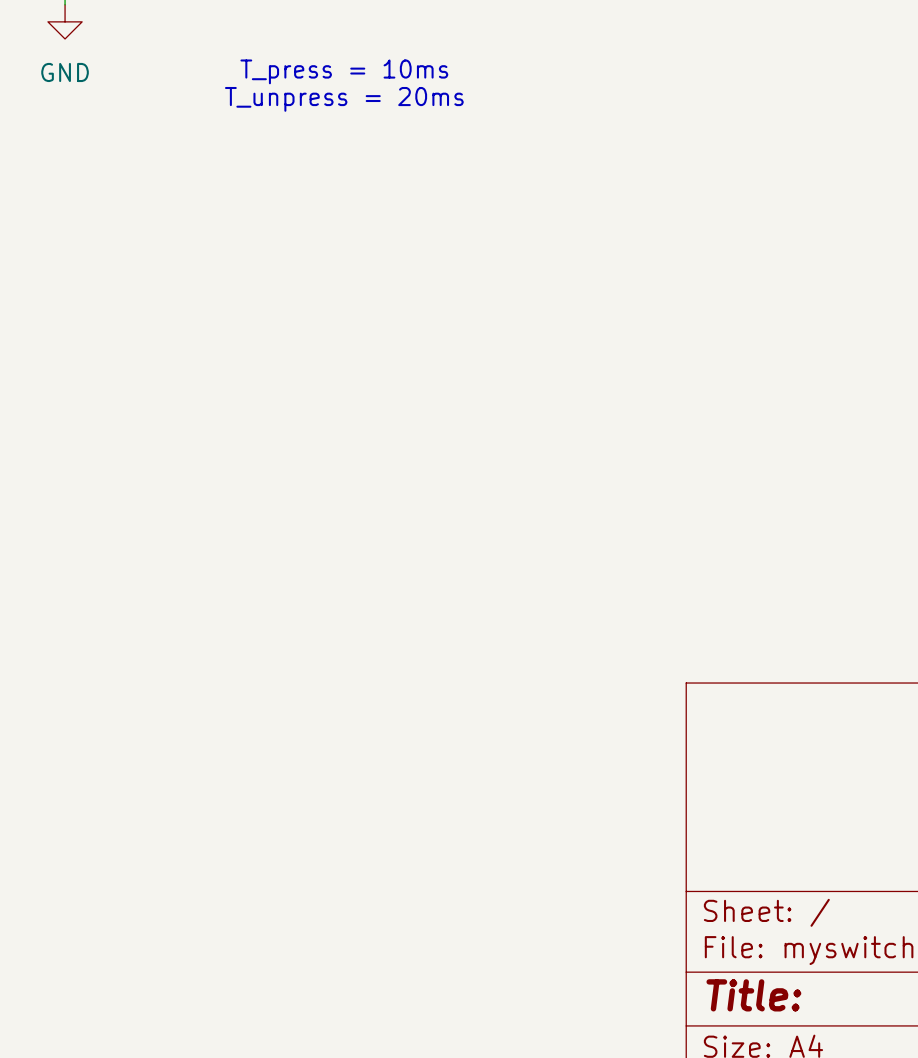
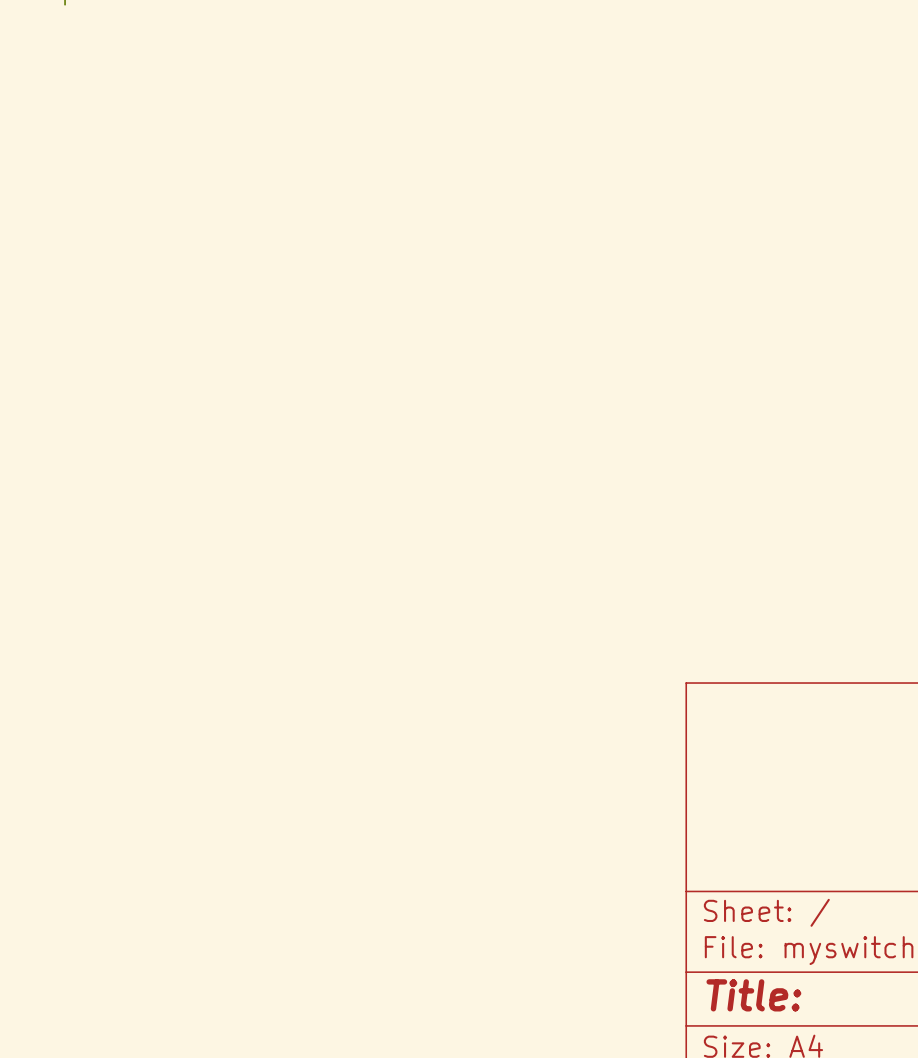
power symbol: GND (65, 21) -> none
text: T_press = 10ms (344, 71) -> none
text: T_unpress = 20ms (344, 99) -> none

